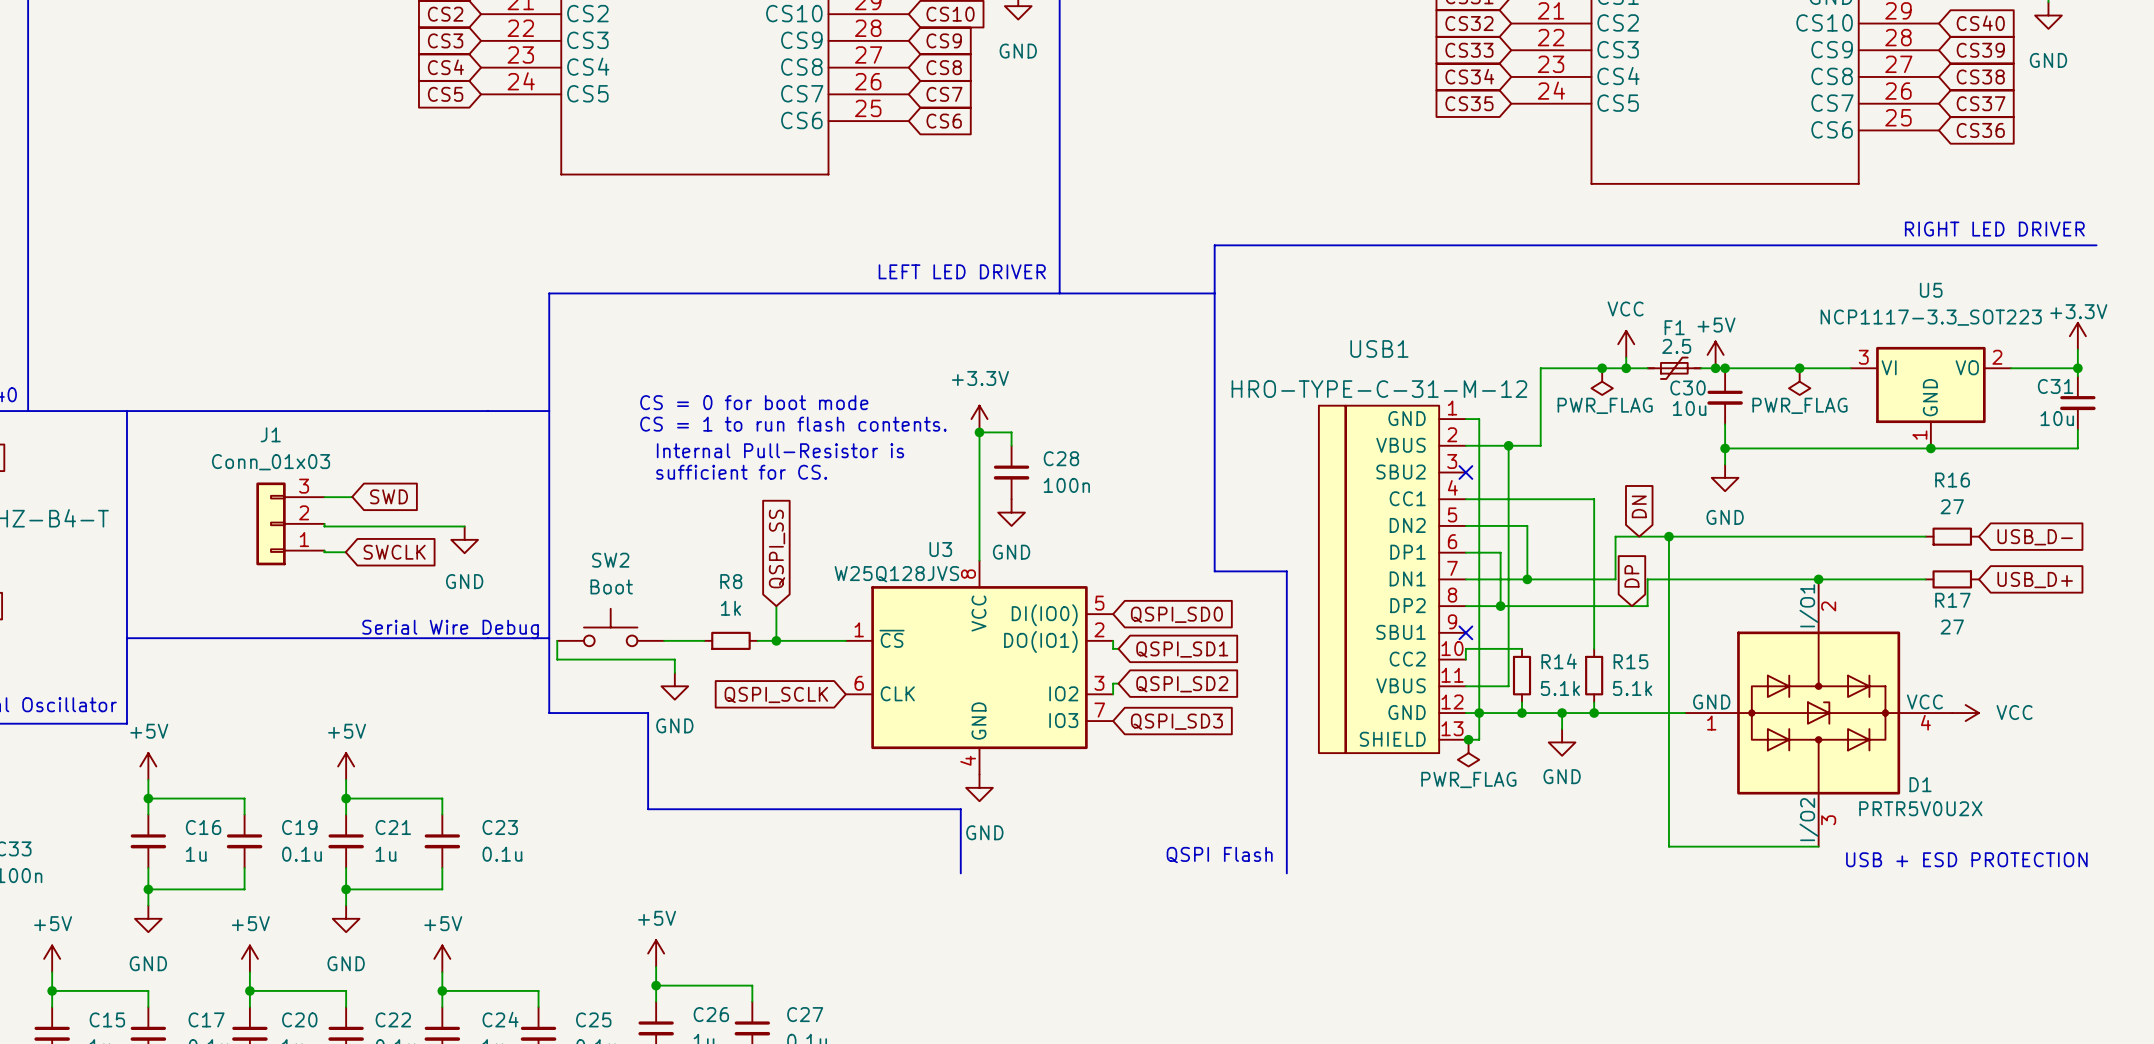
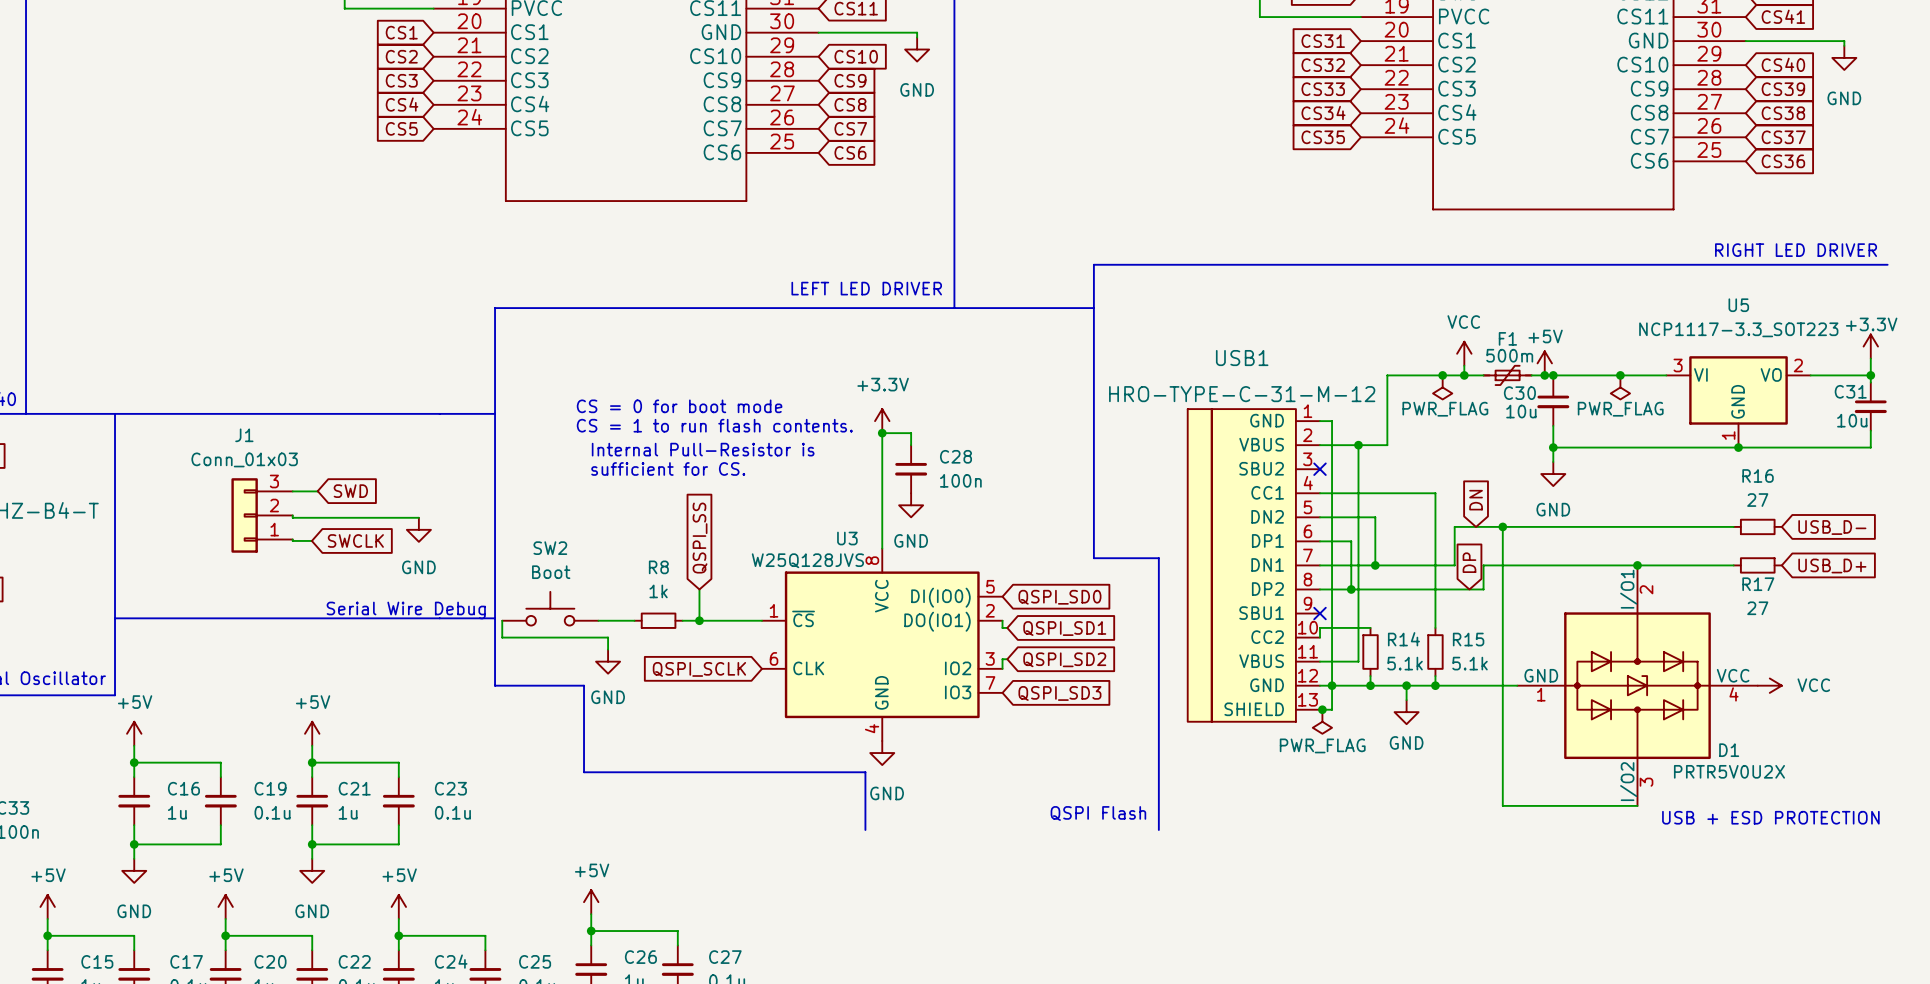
F1 value: 2.5 (1676, 346) -> 500m (1509, 355)

